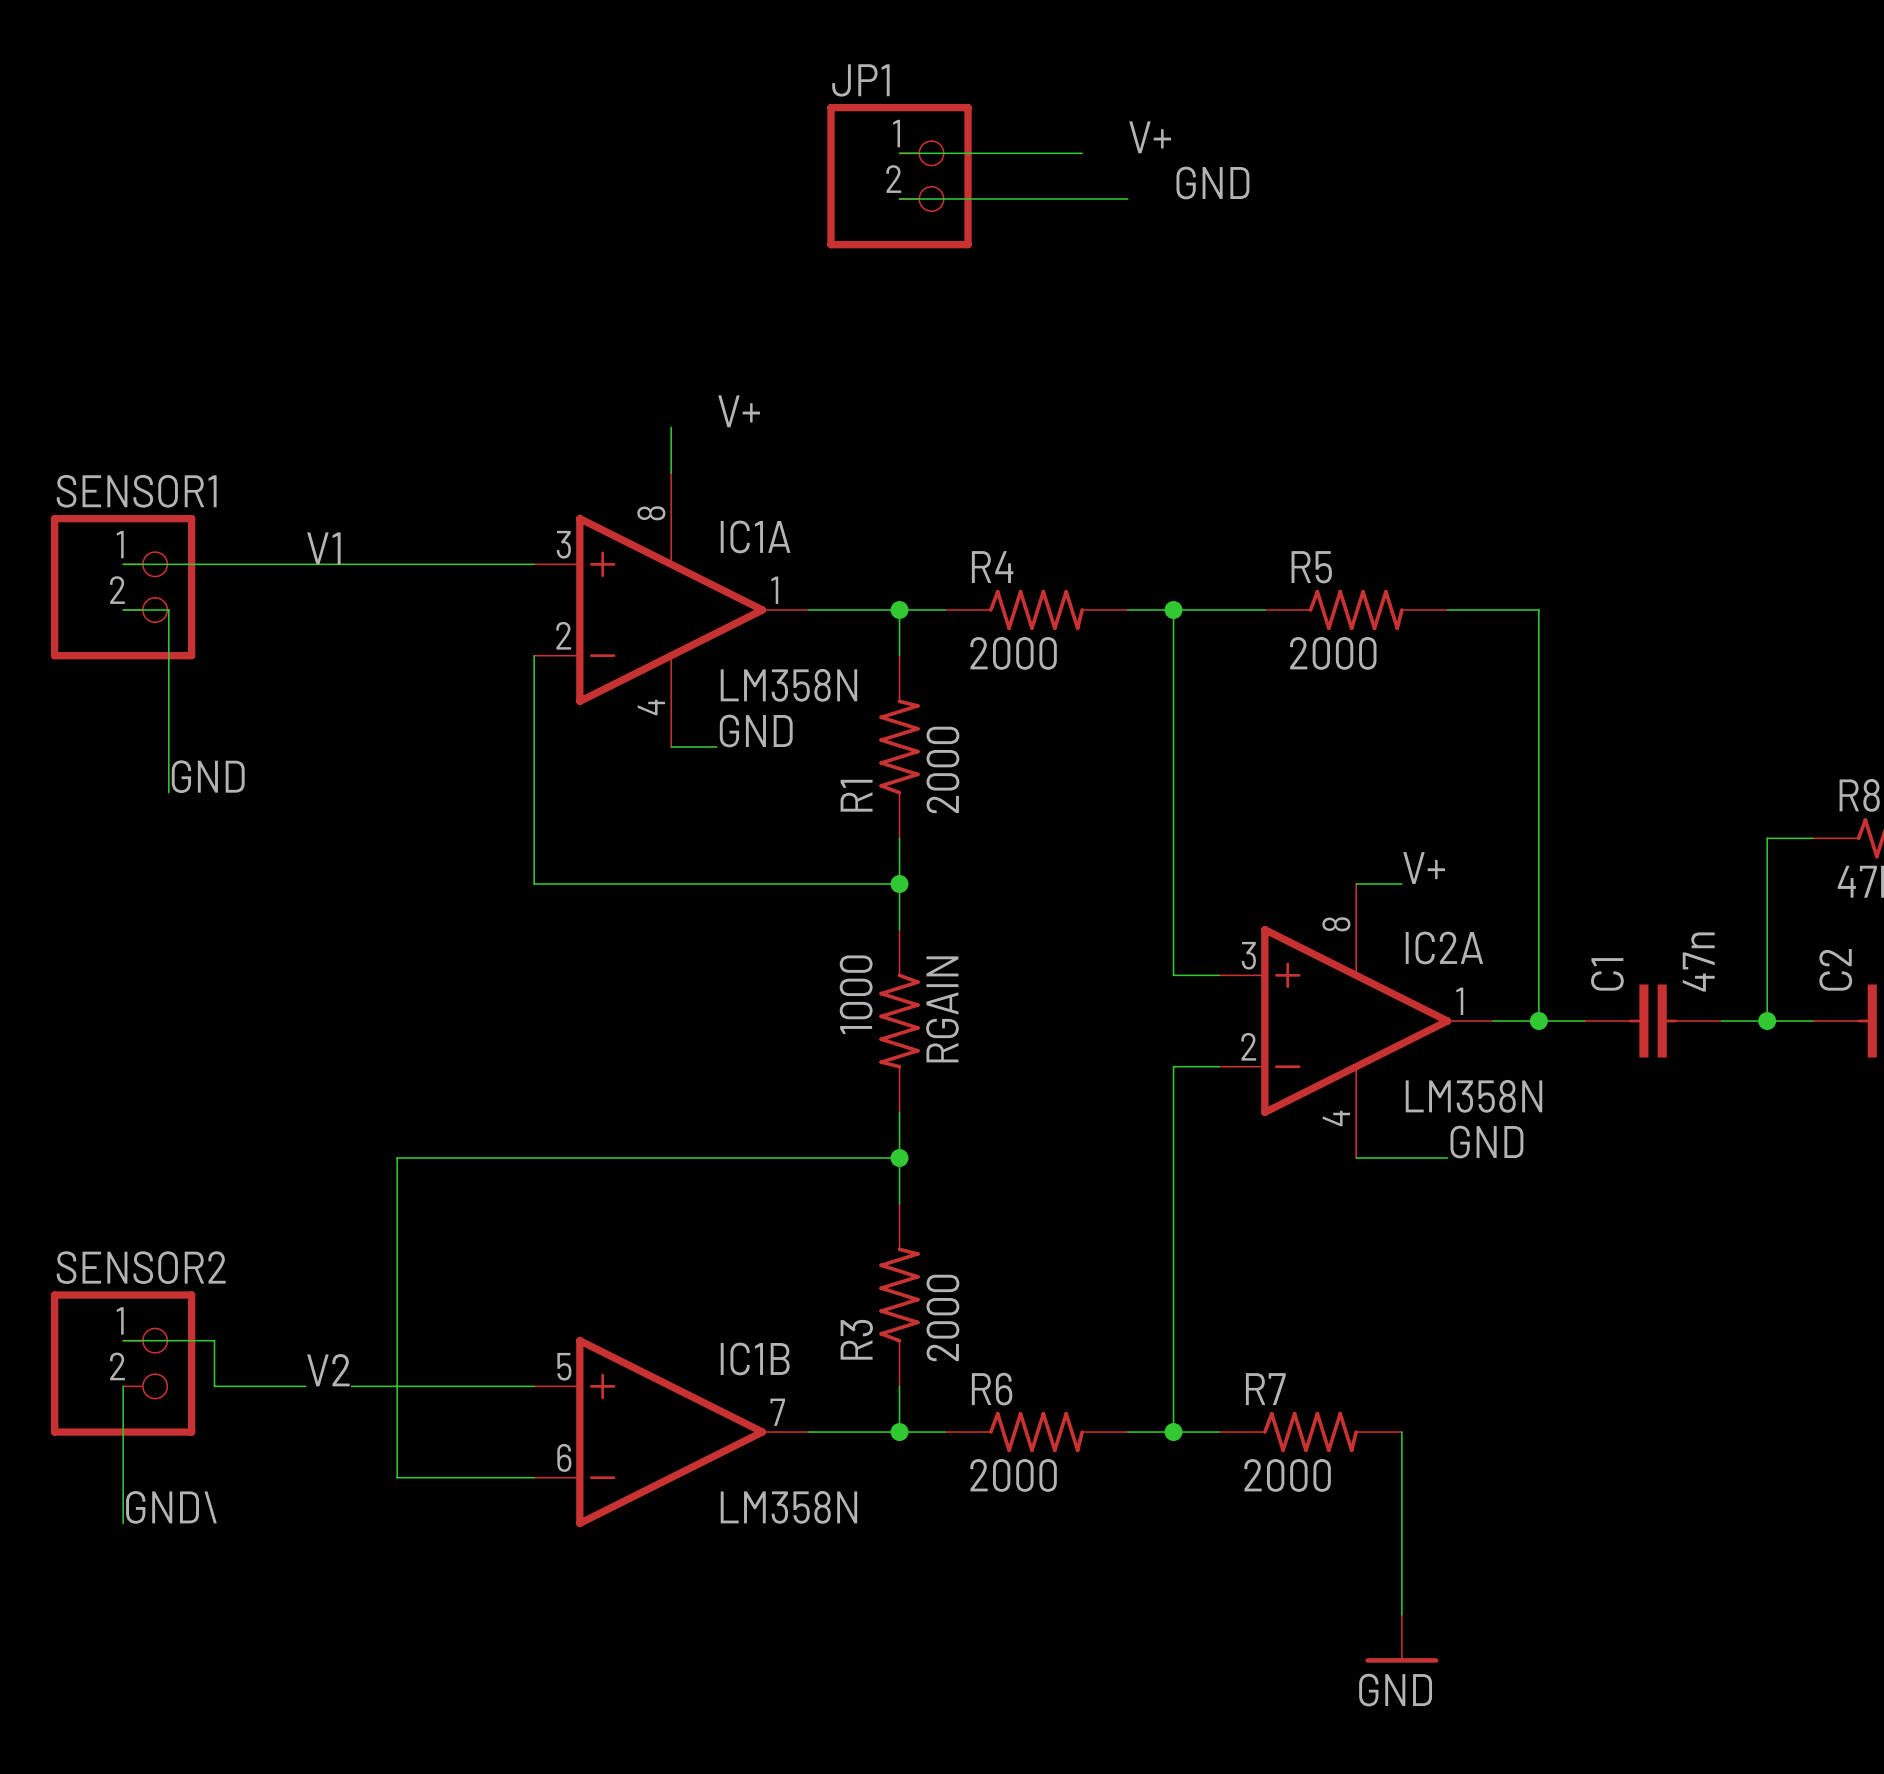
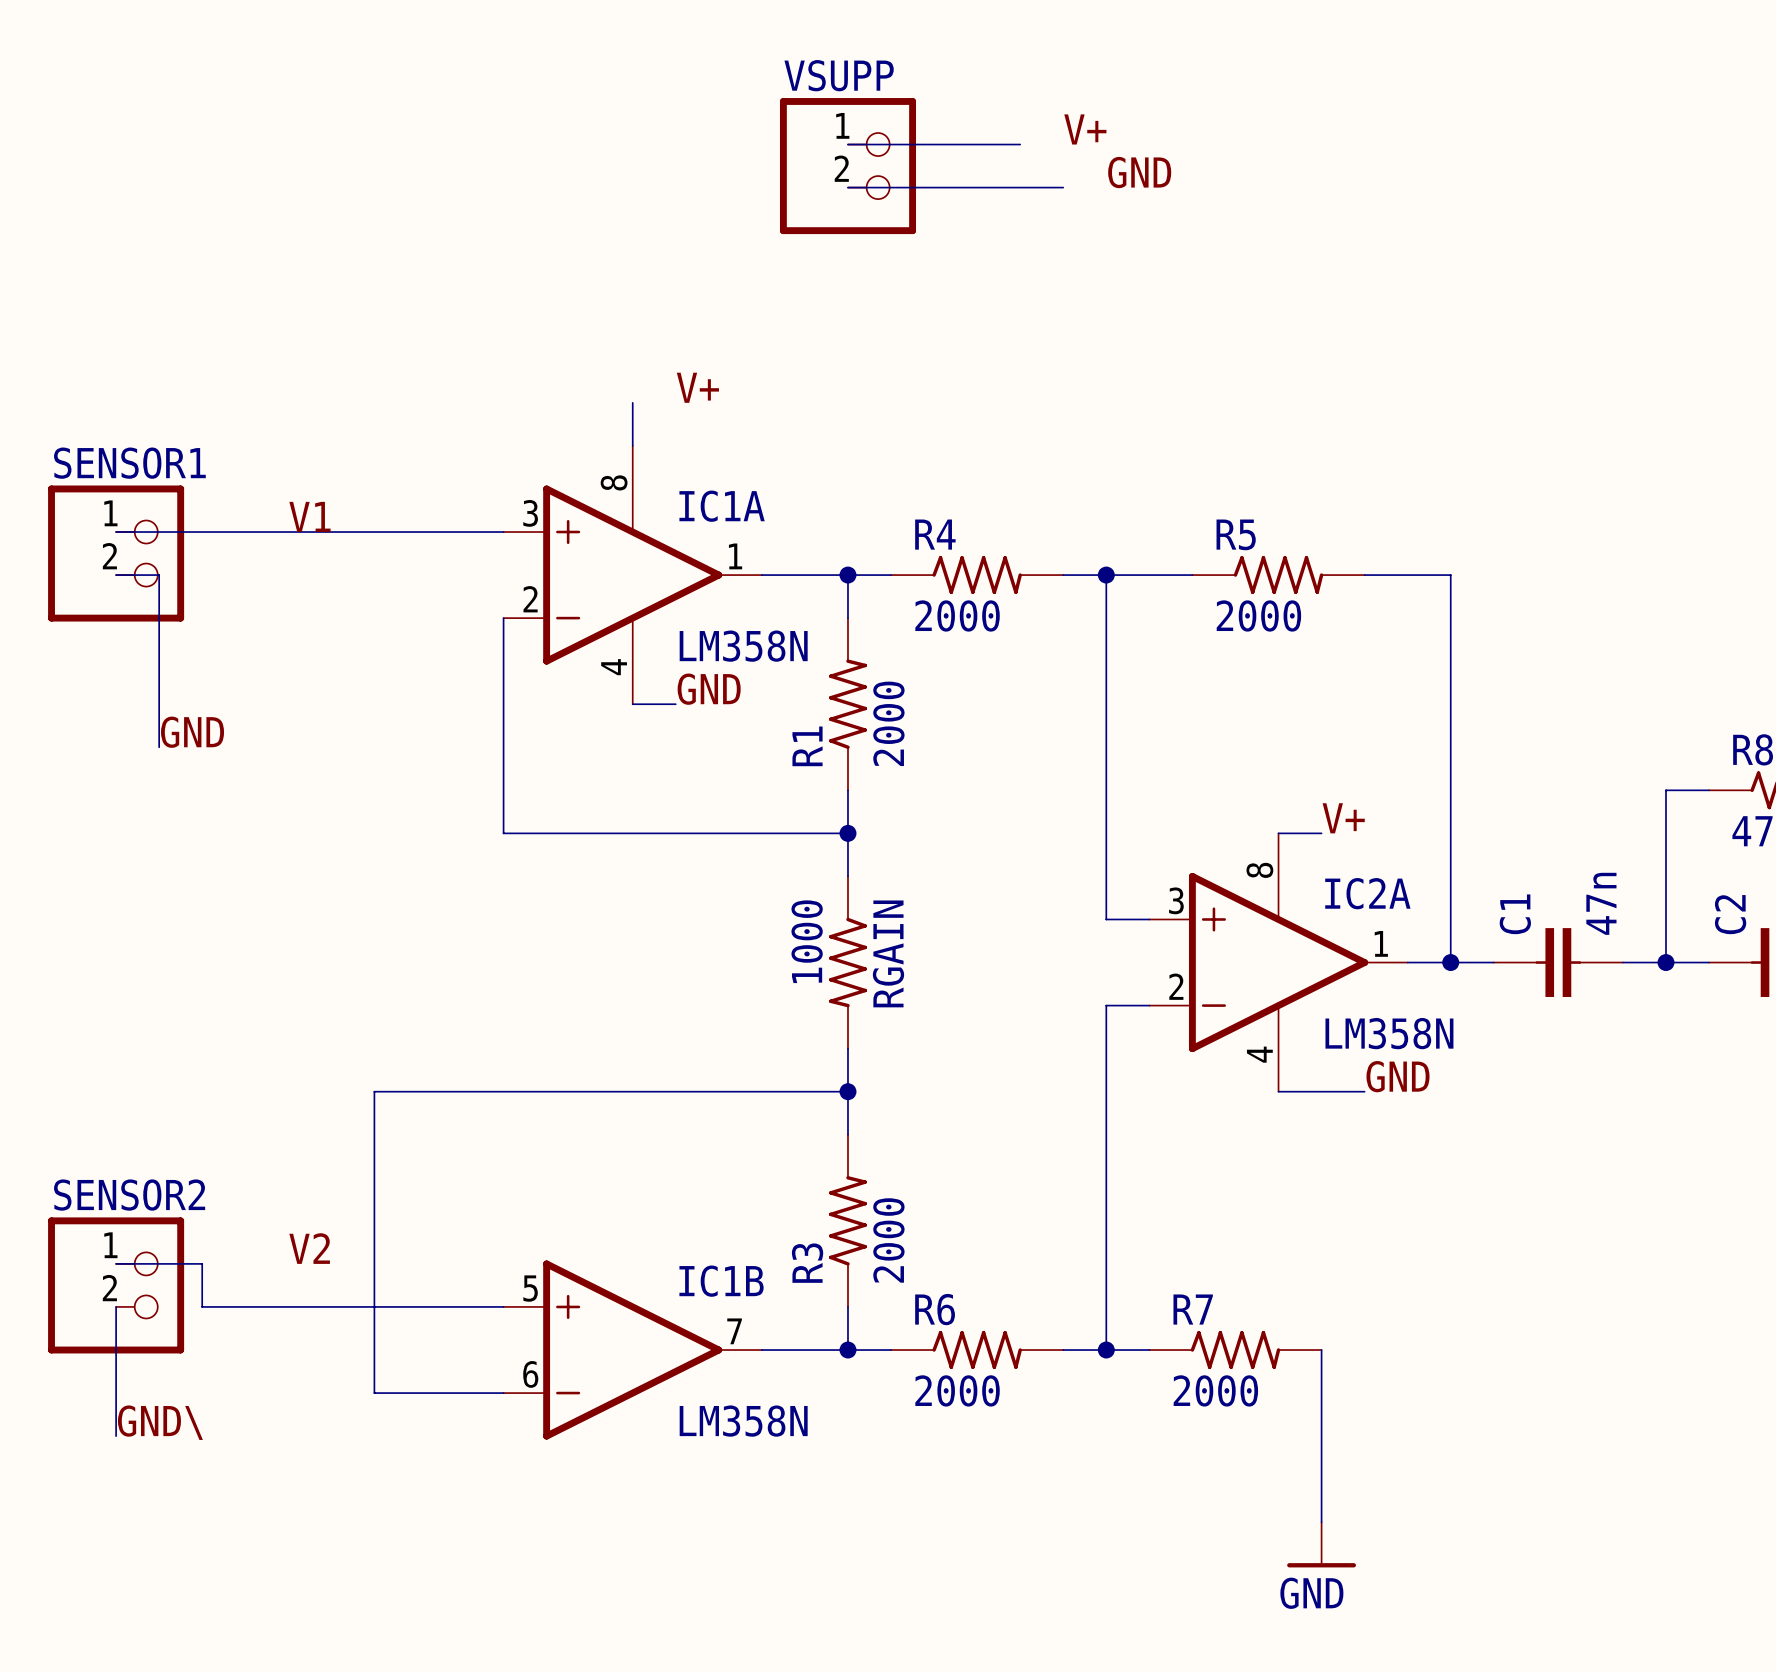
JP1 name: JP1 (860, 80) -> VSUPP (839, 75)
label position: V2 (328, 1370) -> V2 (309, 1248)
wire: none -> (288, 1306) (331, 1306)

